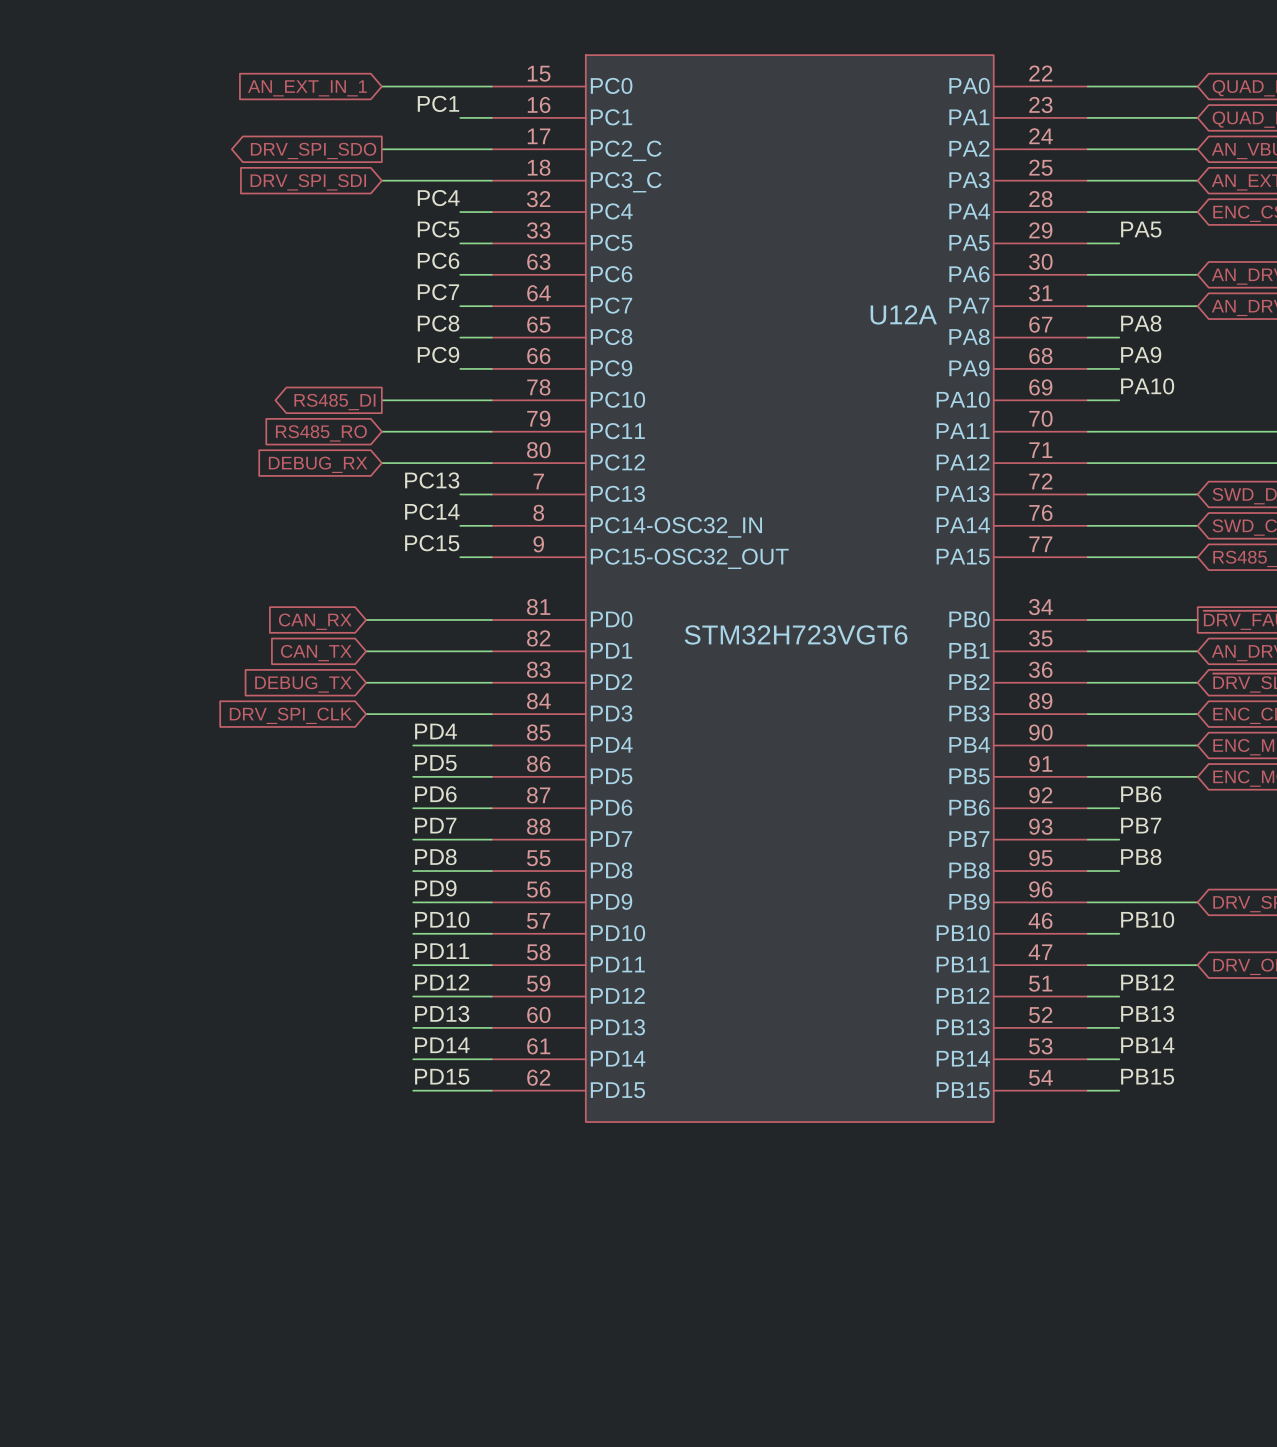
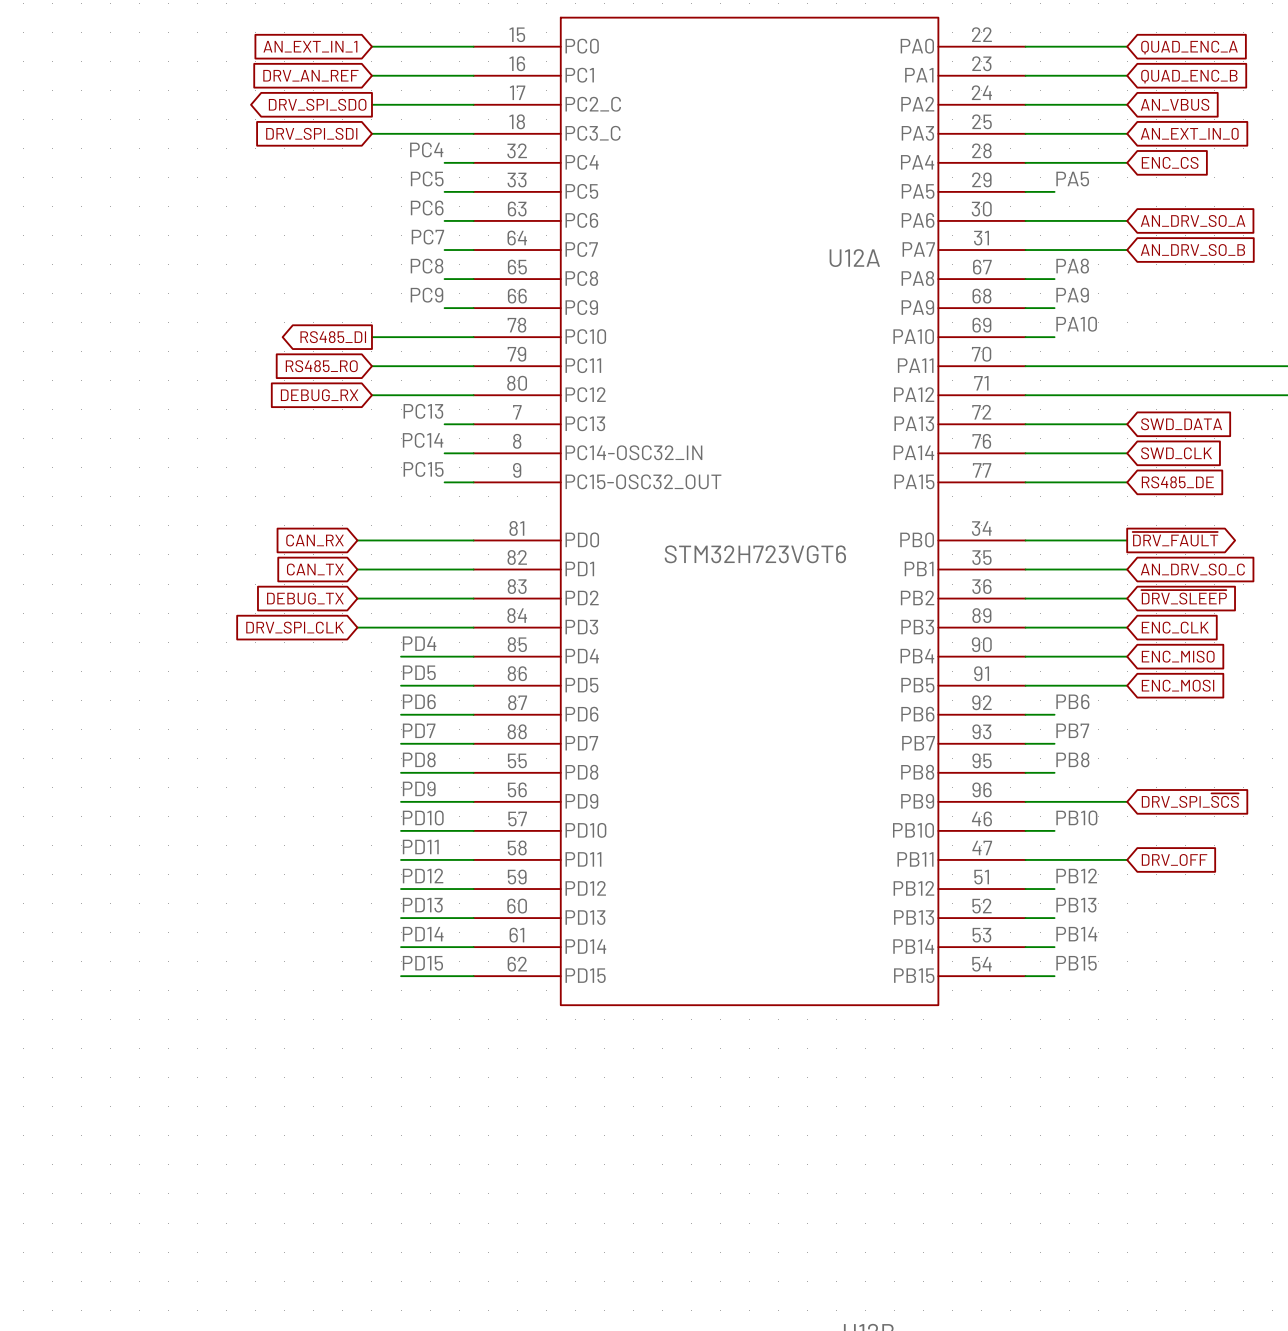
label: PC1 (438, 103) -> none
wire: none -> (371, 75) (444, 75)
global label: none -> DRV_AN_REF (310, 75)

